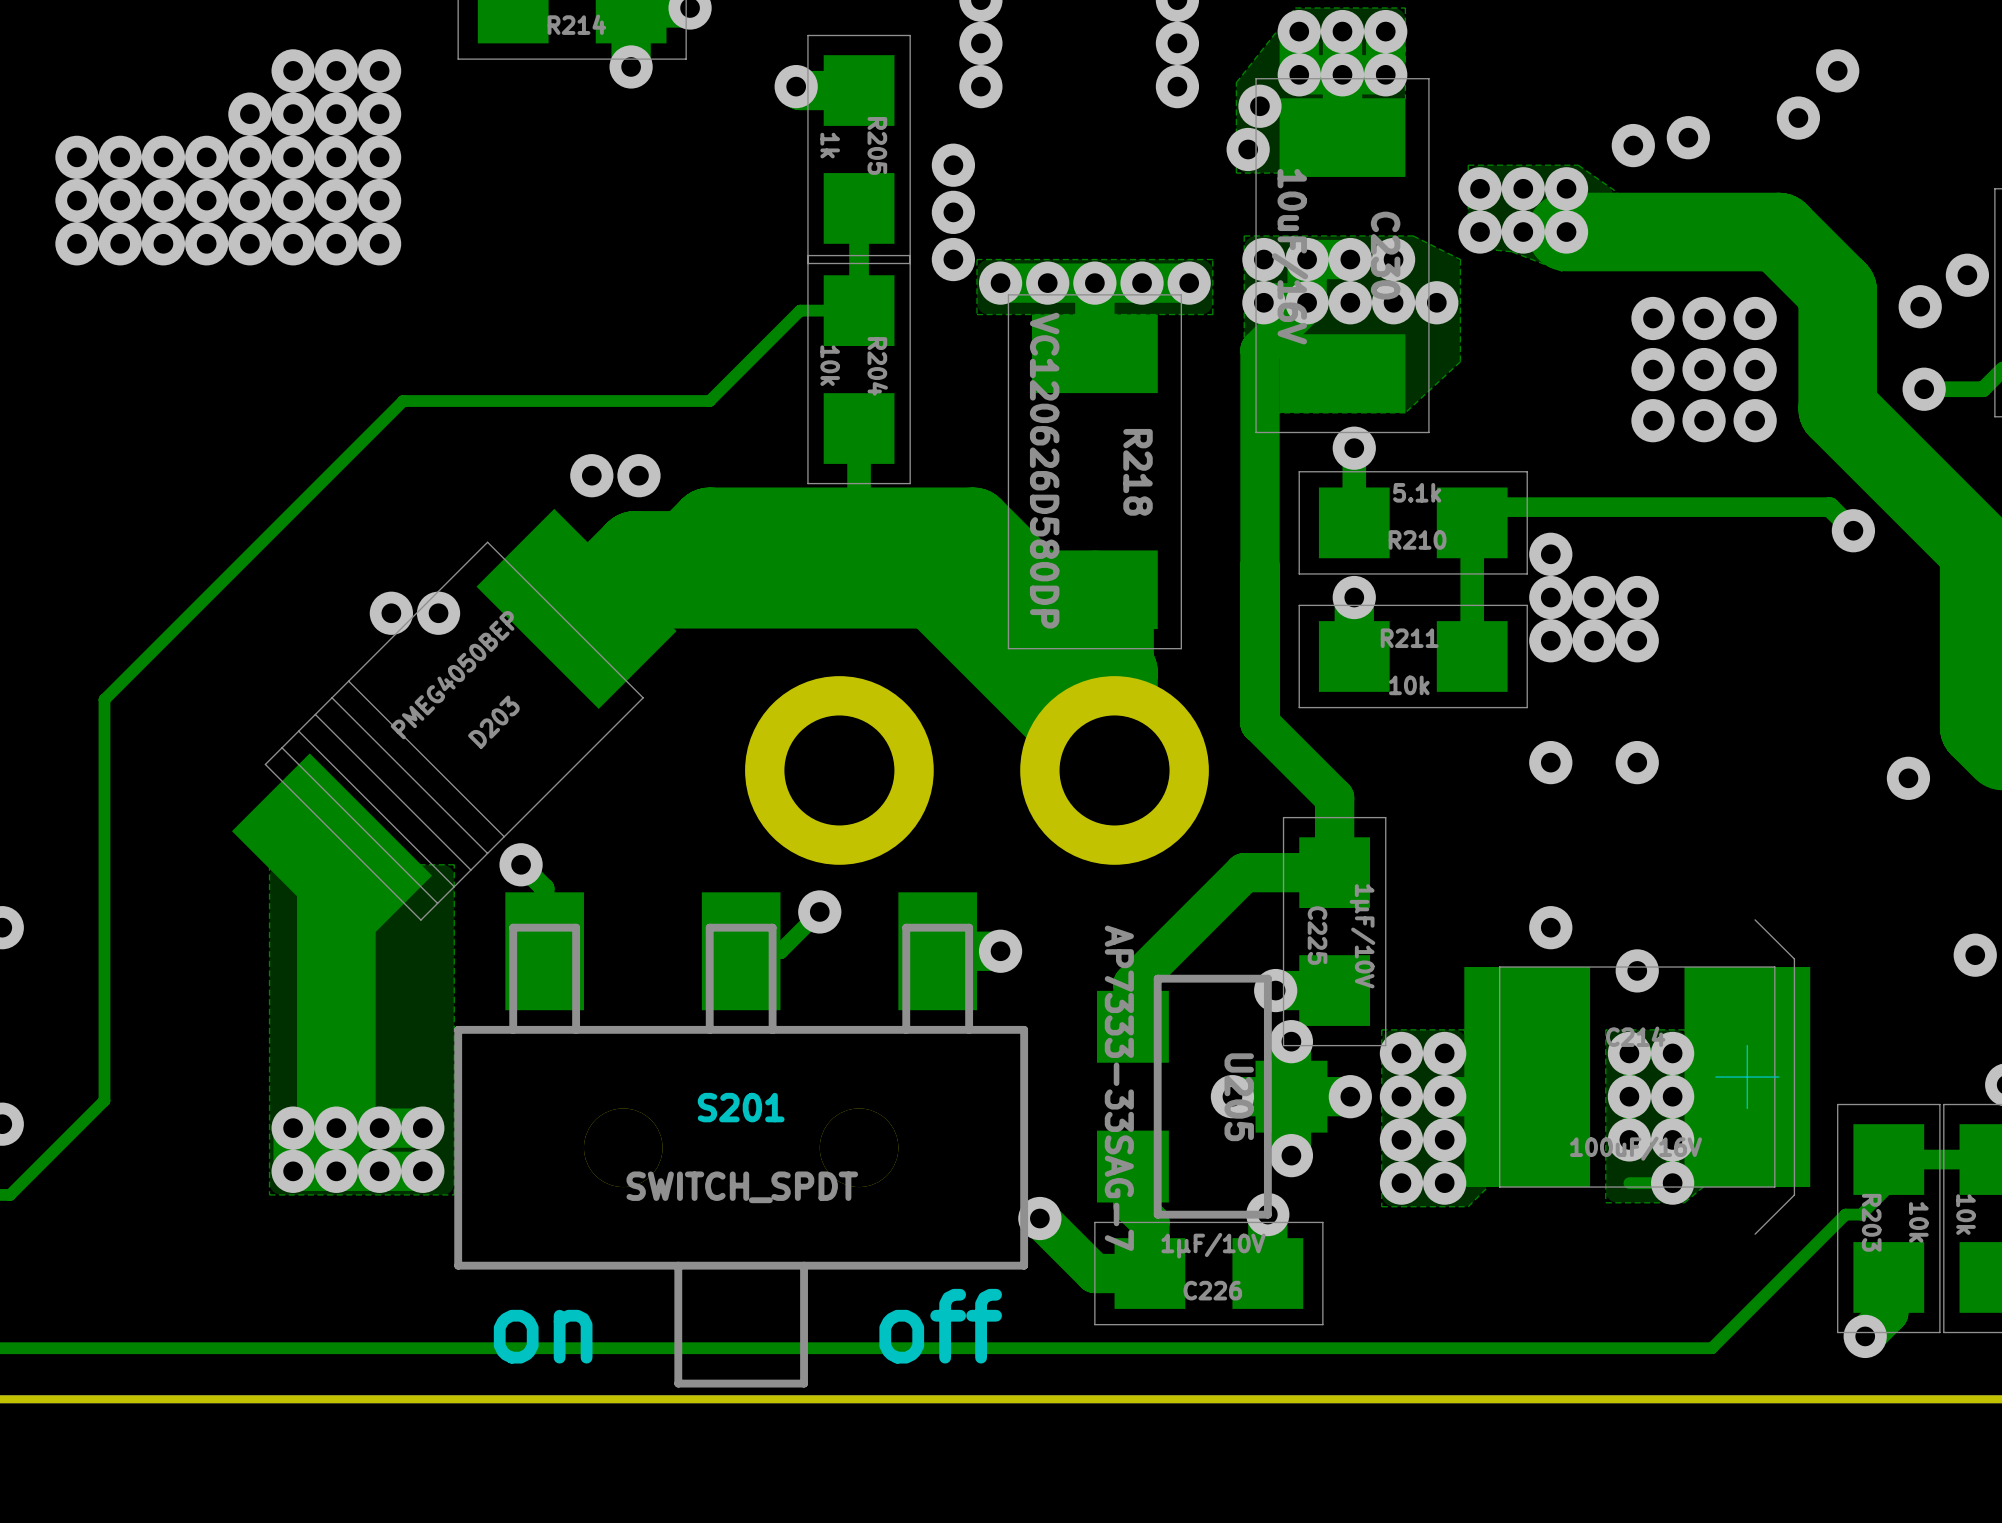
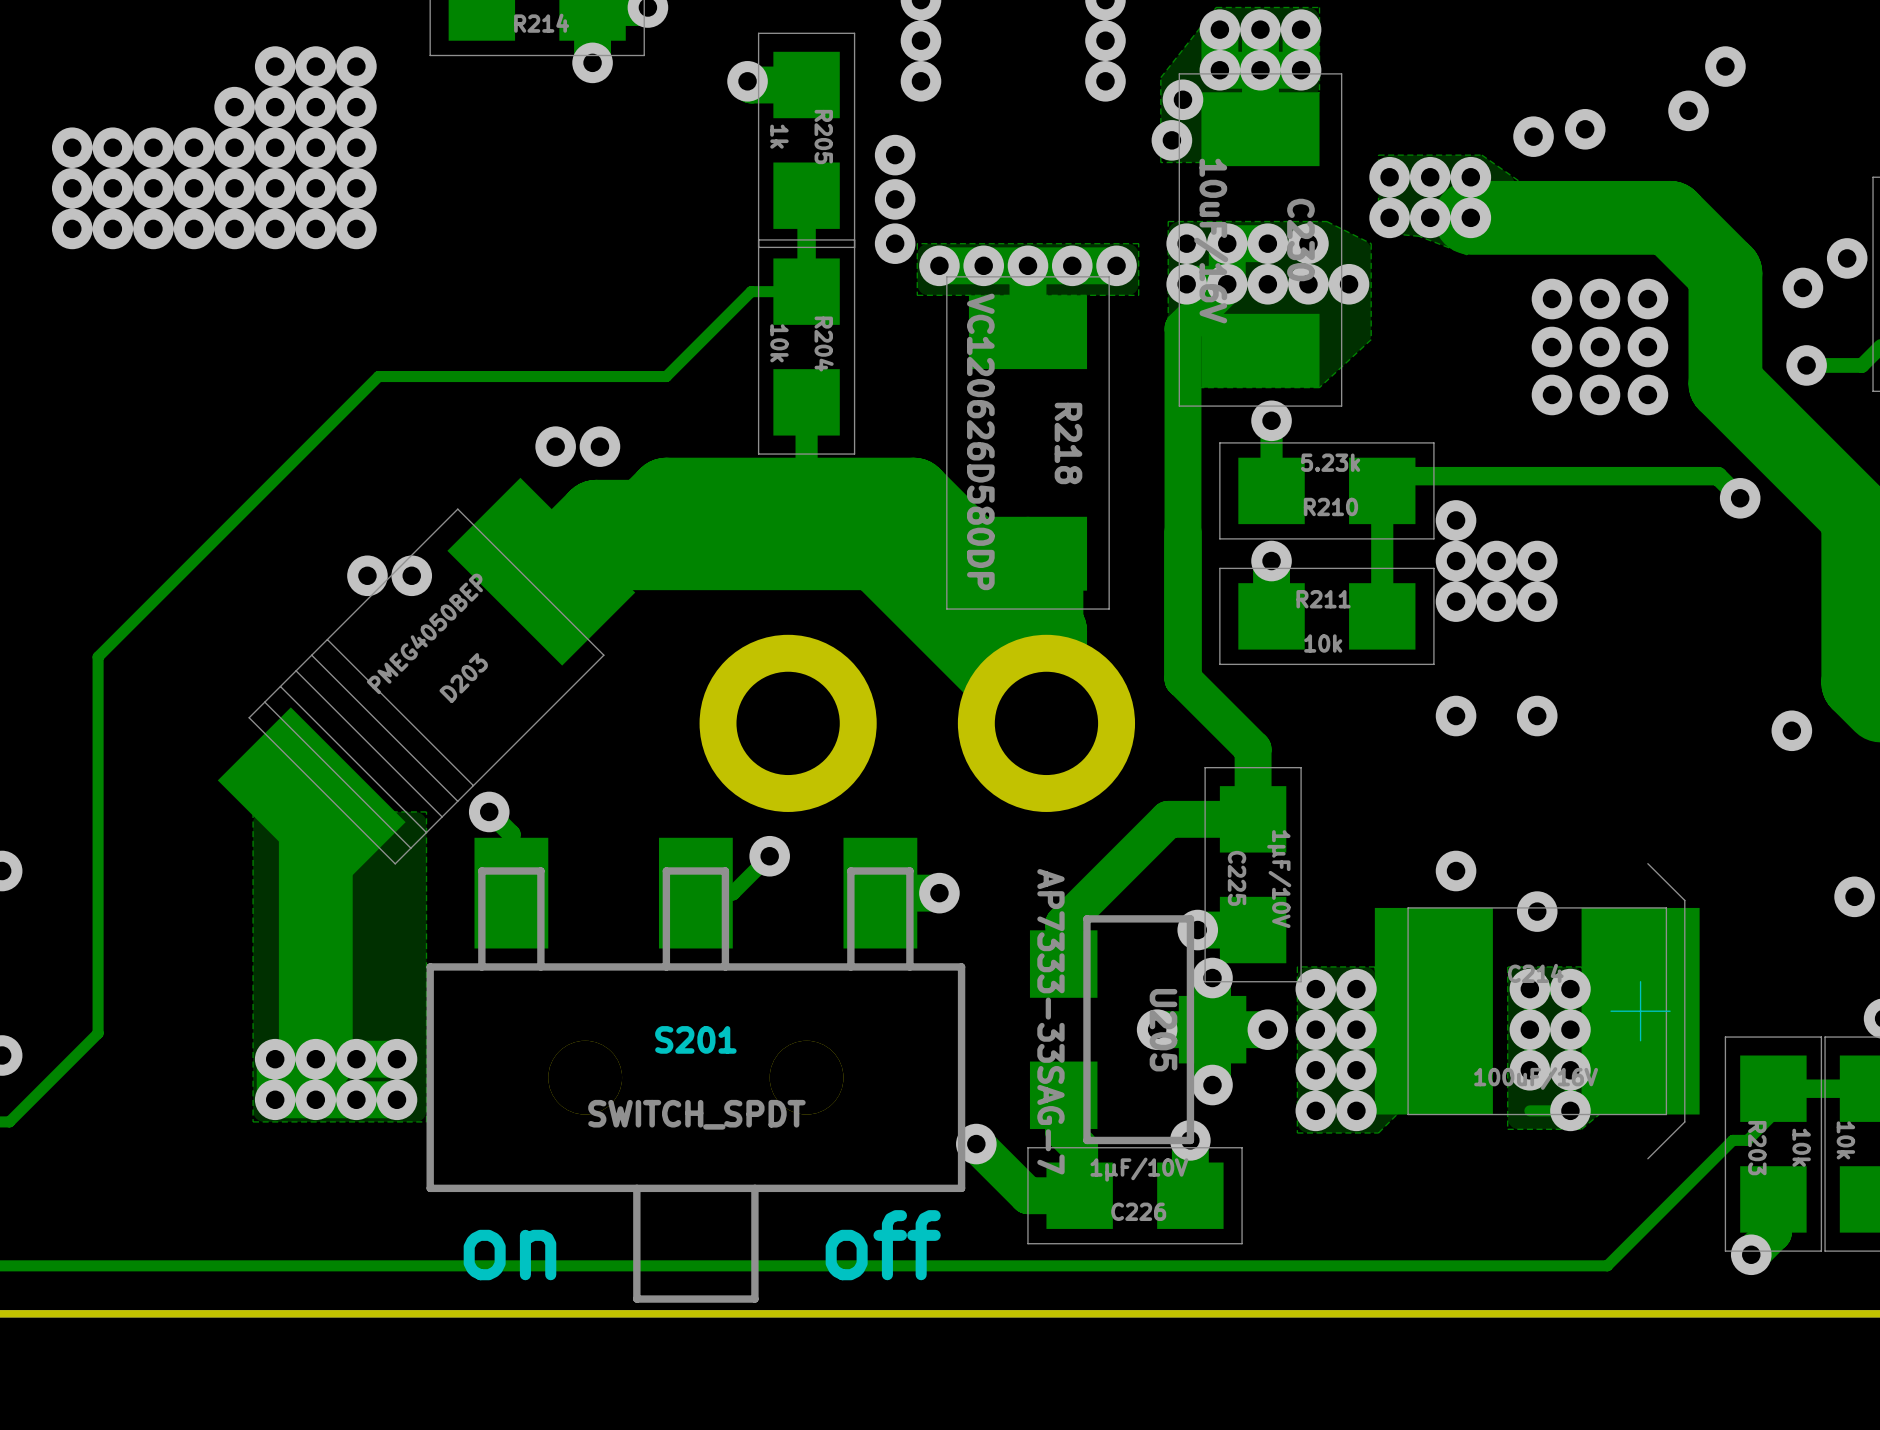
R210 value: 5.1k (1417, 492) -> 5.23k (1330, 462)

